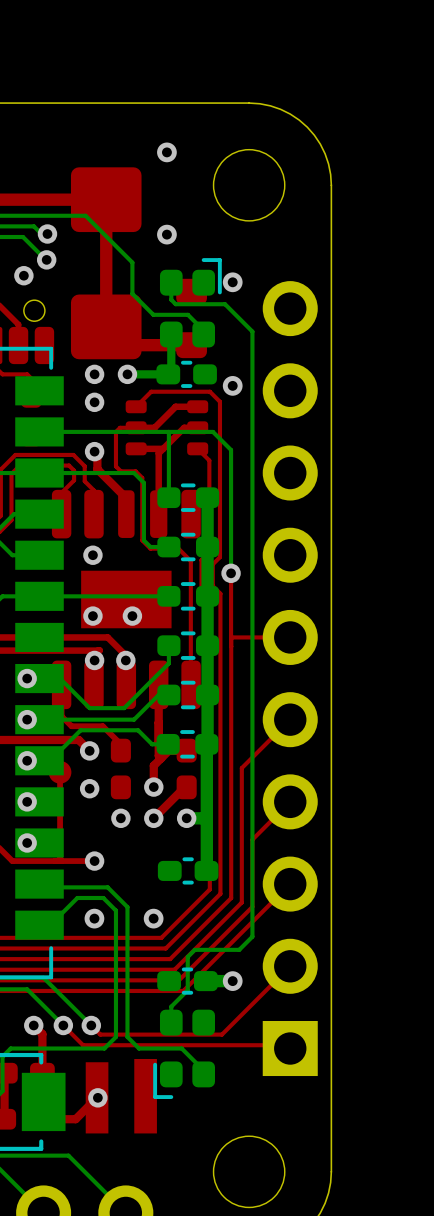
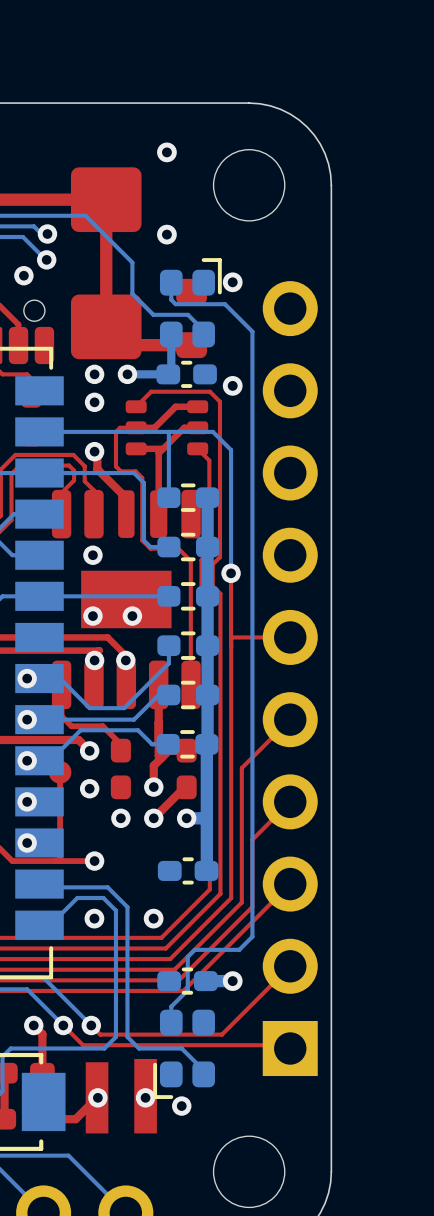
via: none -> (145, 1097)
via: none -> (181, 1106)

